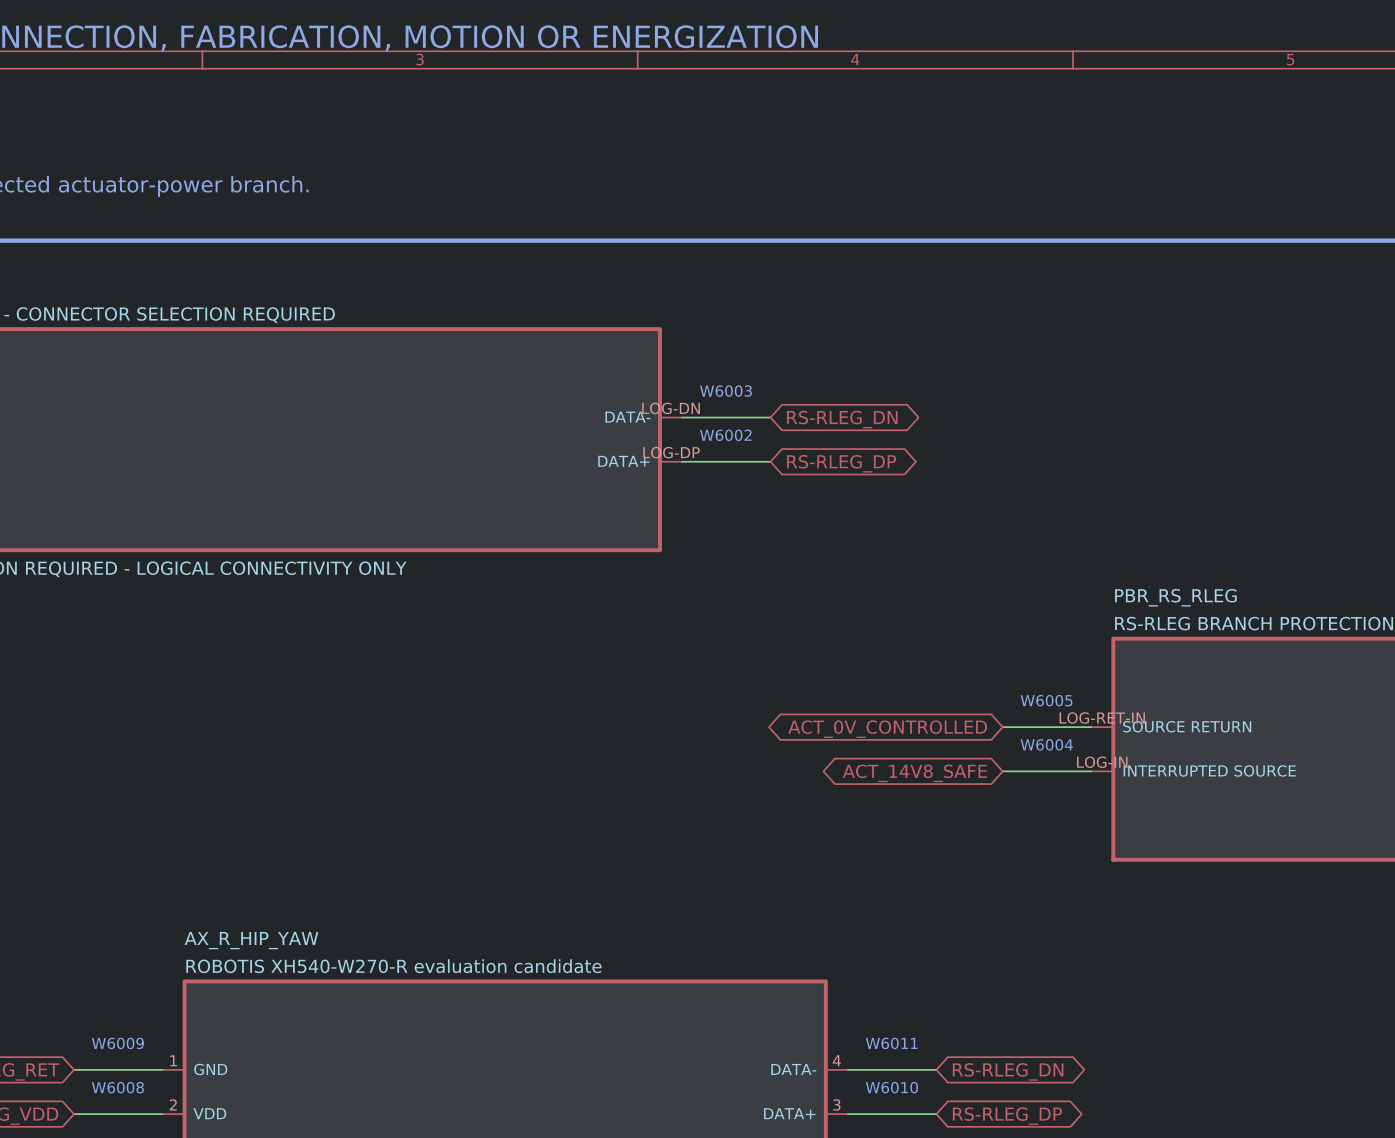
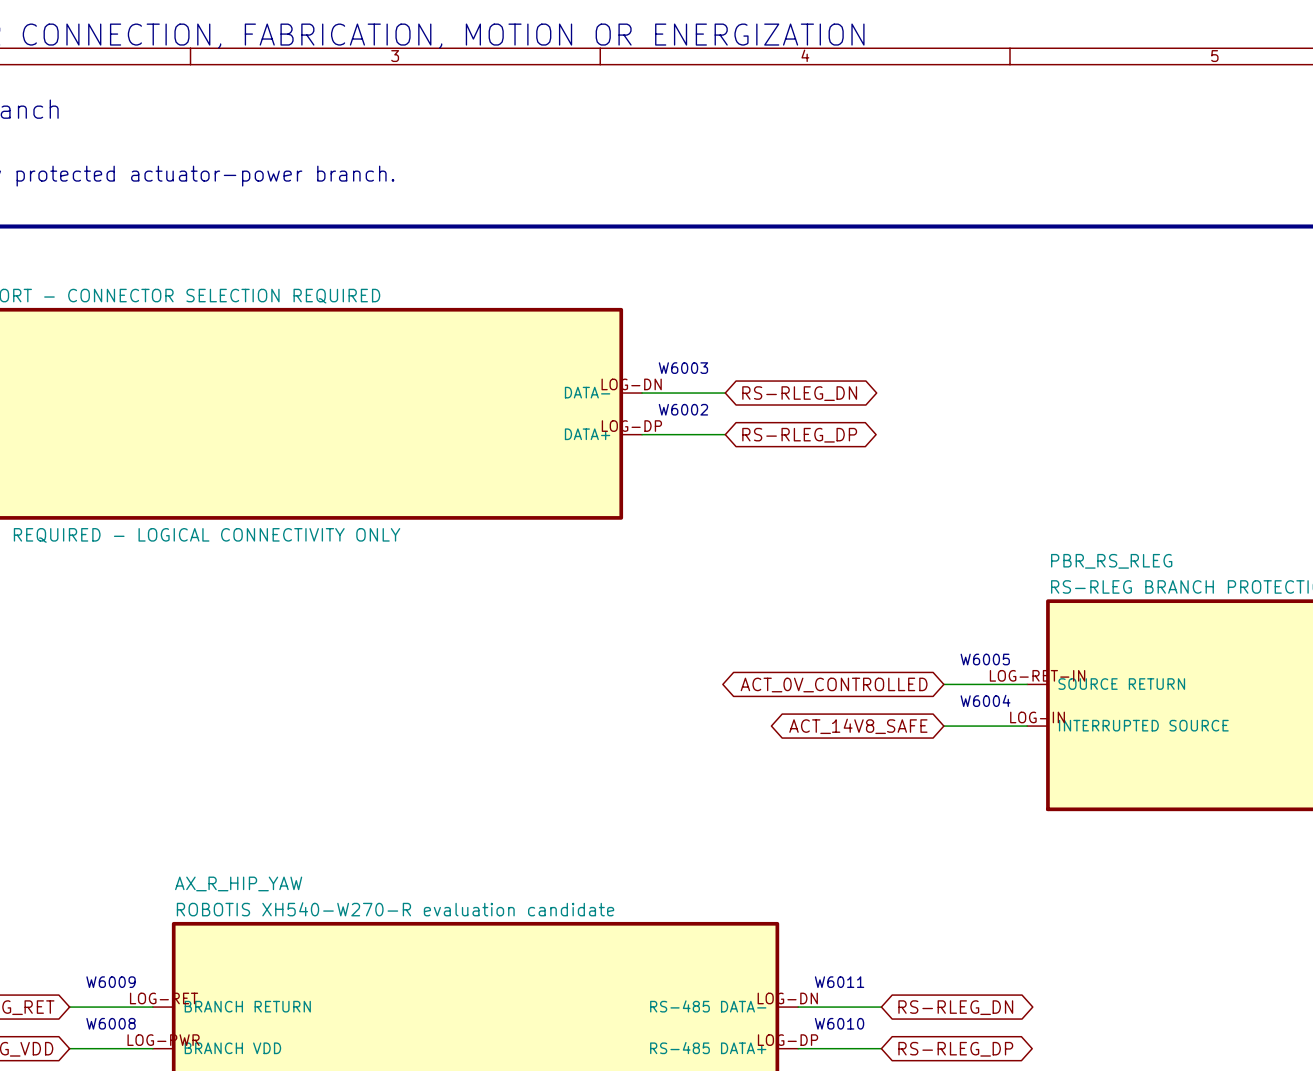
AX_R_HIP_YAW pin number: 1 (173, 1060) -> LOG-RET (164, 998)
AX_R_HIP_YAW pin number: 4 (836, 1060) -> LOG-DN (787, 998)
AX_R_HIP_YAW pin name: GND (210, 1069) -> BRANCH RETURN (247, 1006)
AX_R_HIP_YAW pin name: DATA- (793, 1069) -> RS-485 DATA- (708, 1006)
AX_R_HIP_YAW pin number: 2 (173, 1104) -> LOG-PWR (163, 1040)
AX_R_HIP_YAW pin number: 3 (836, 1104) -> LOG-DP (788, 1040)
AX_R_HIP_YAW pin name: VDD (209, 1113) -> BRANCH VDD (232, 1048)
AX_R_HIP_YAW pin name: DATA+ (789, 1113) -> RS-485 DATA+ (708, 1048)

